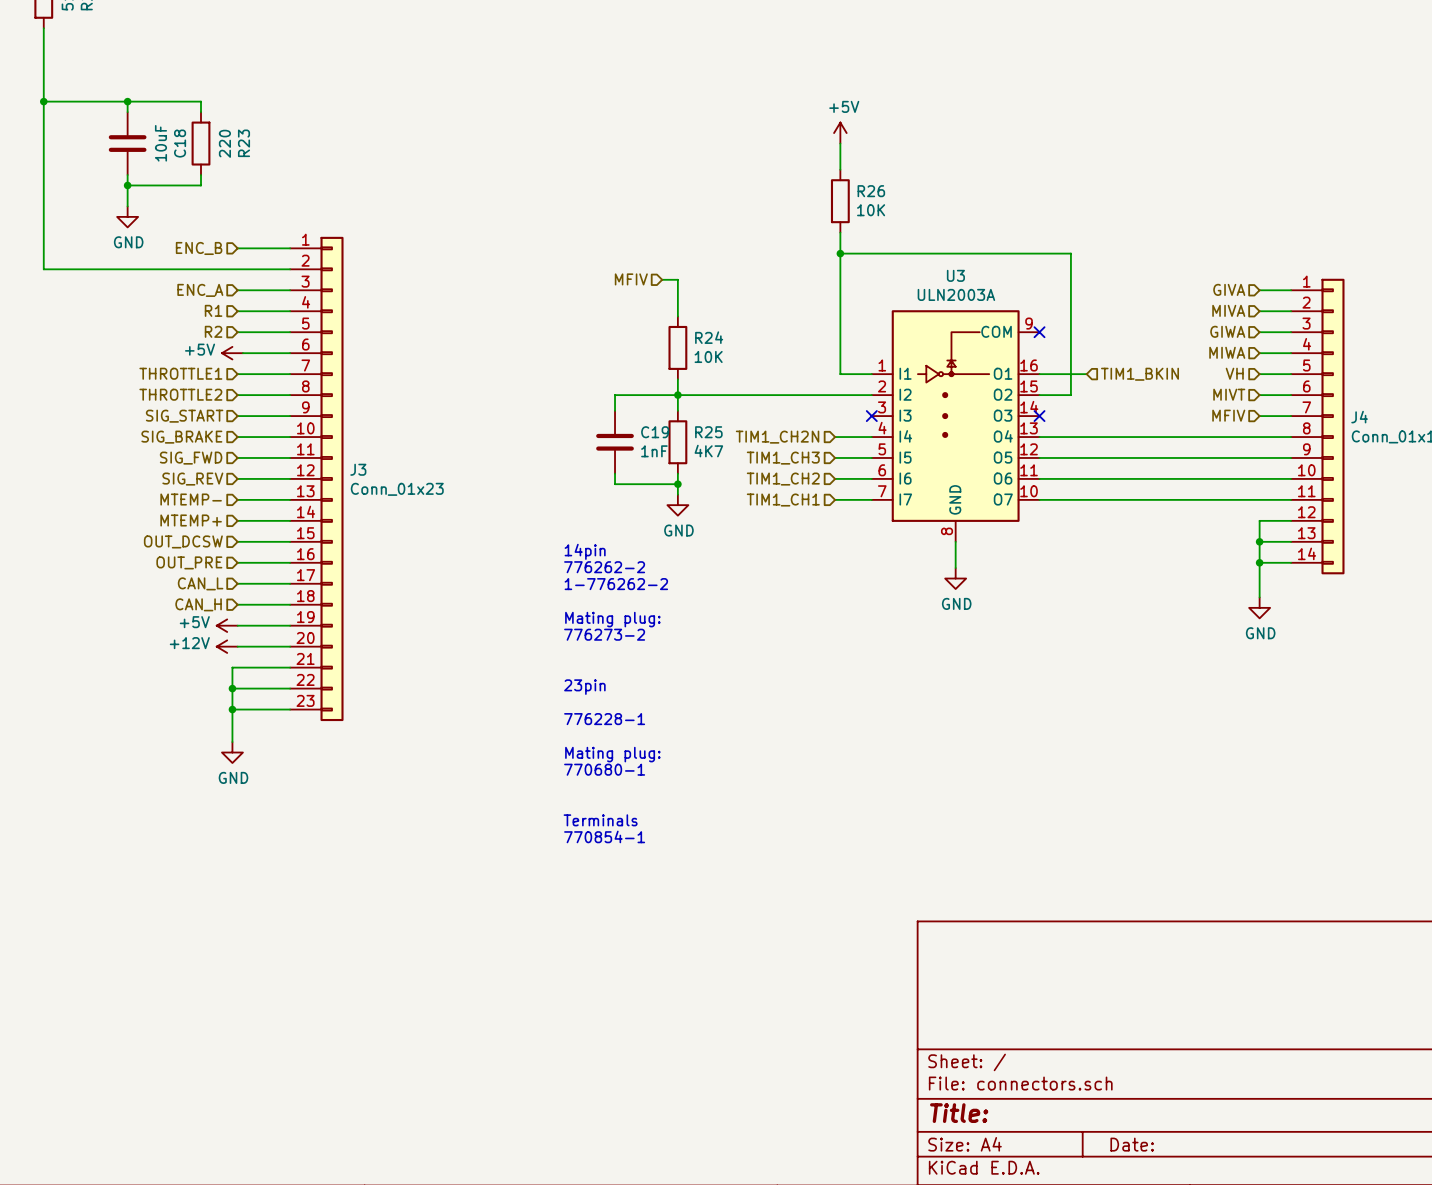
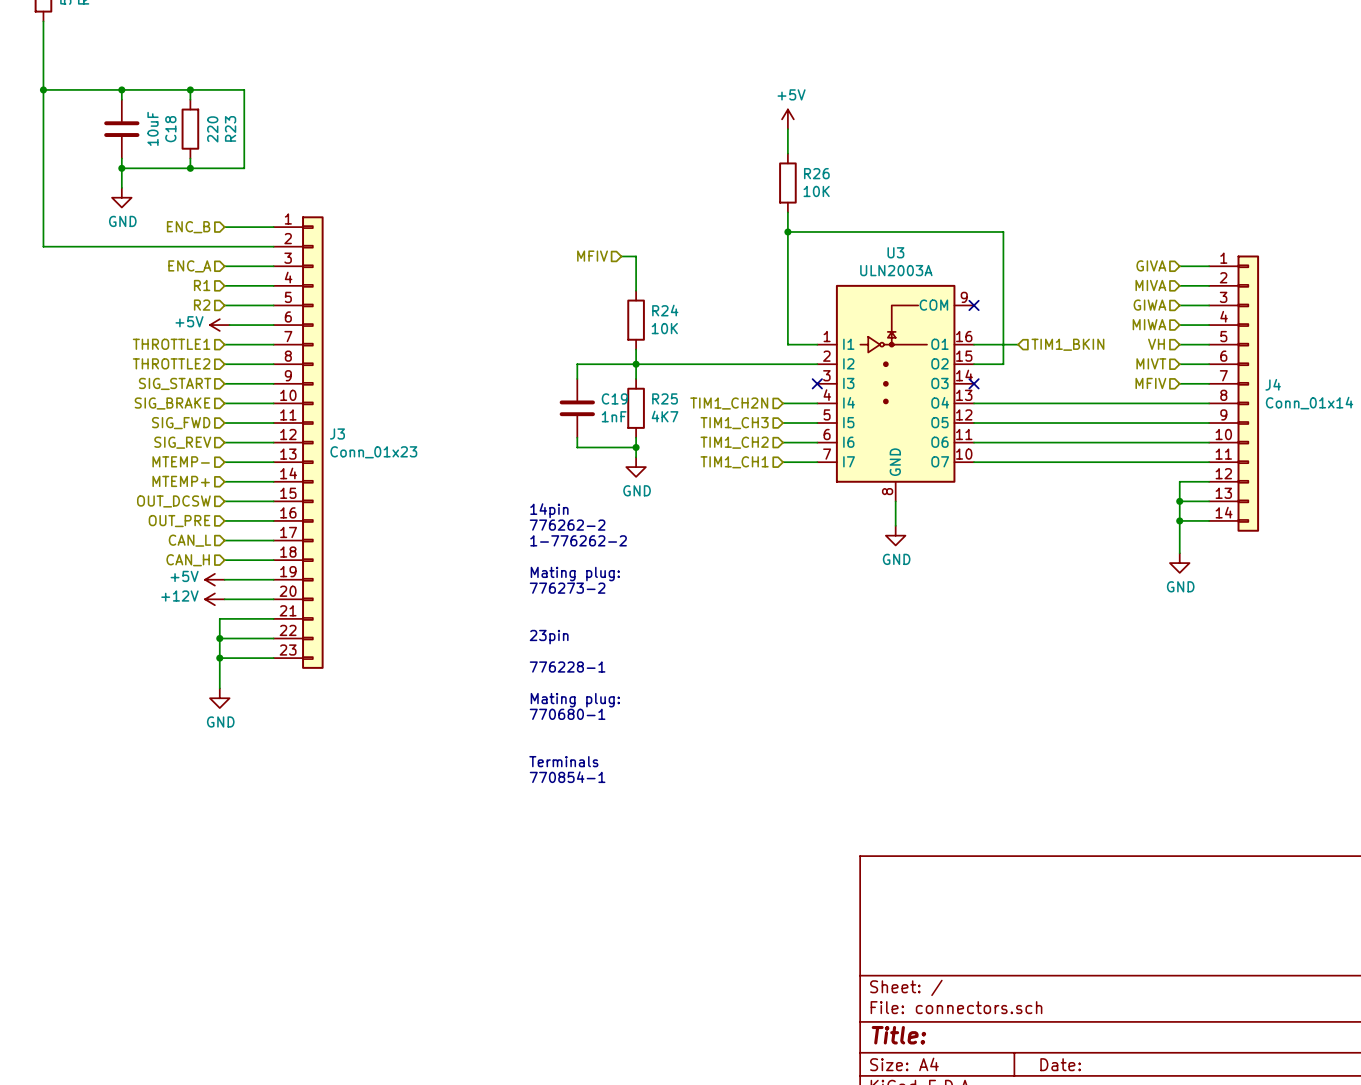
wire: none -> (190, 89) (244, 89) (244, 168) (190, 168)
junction: none -> (190, 89)
junction: none -> (190, 168)

